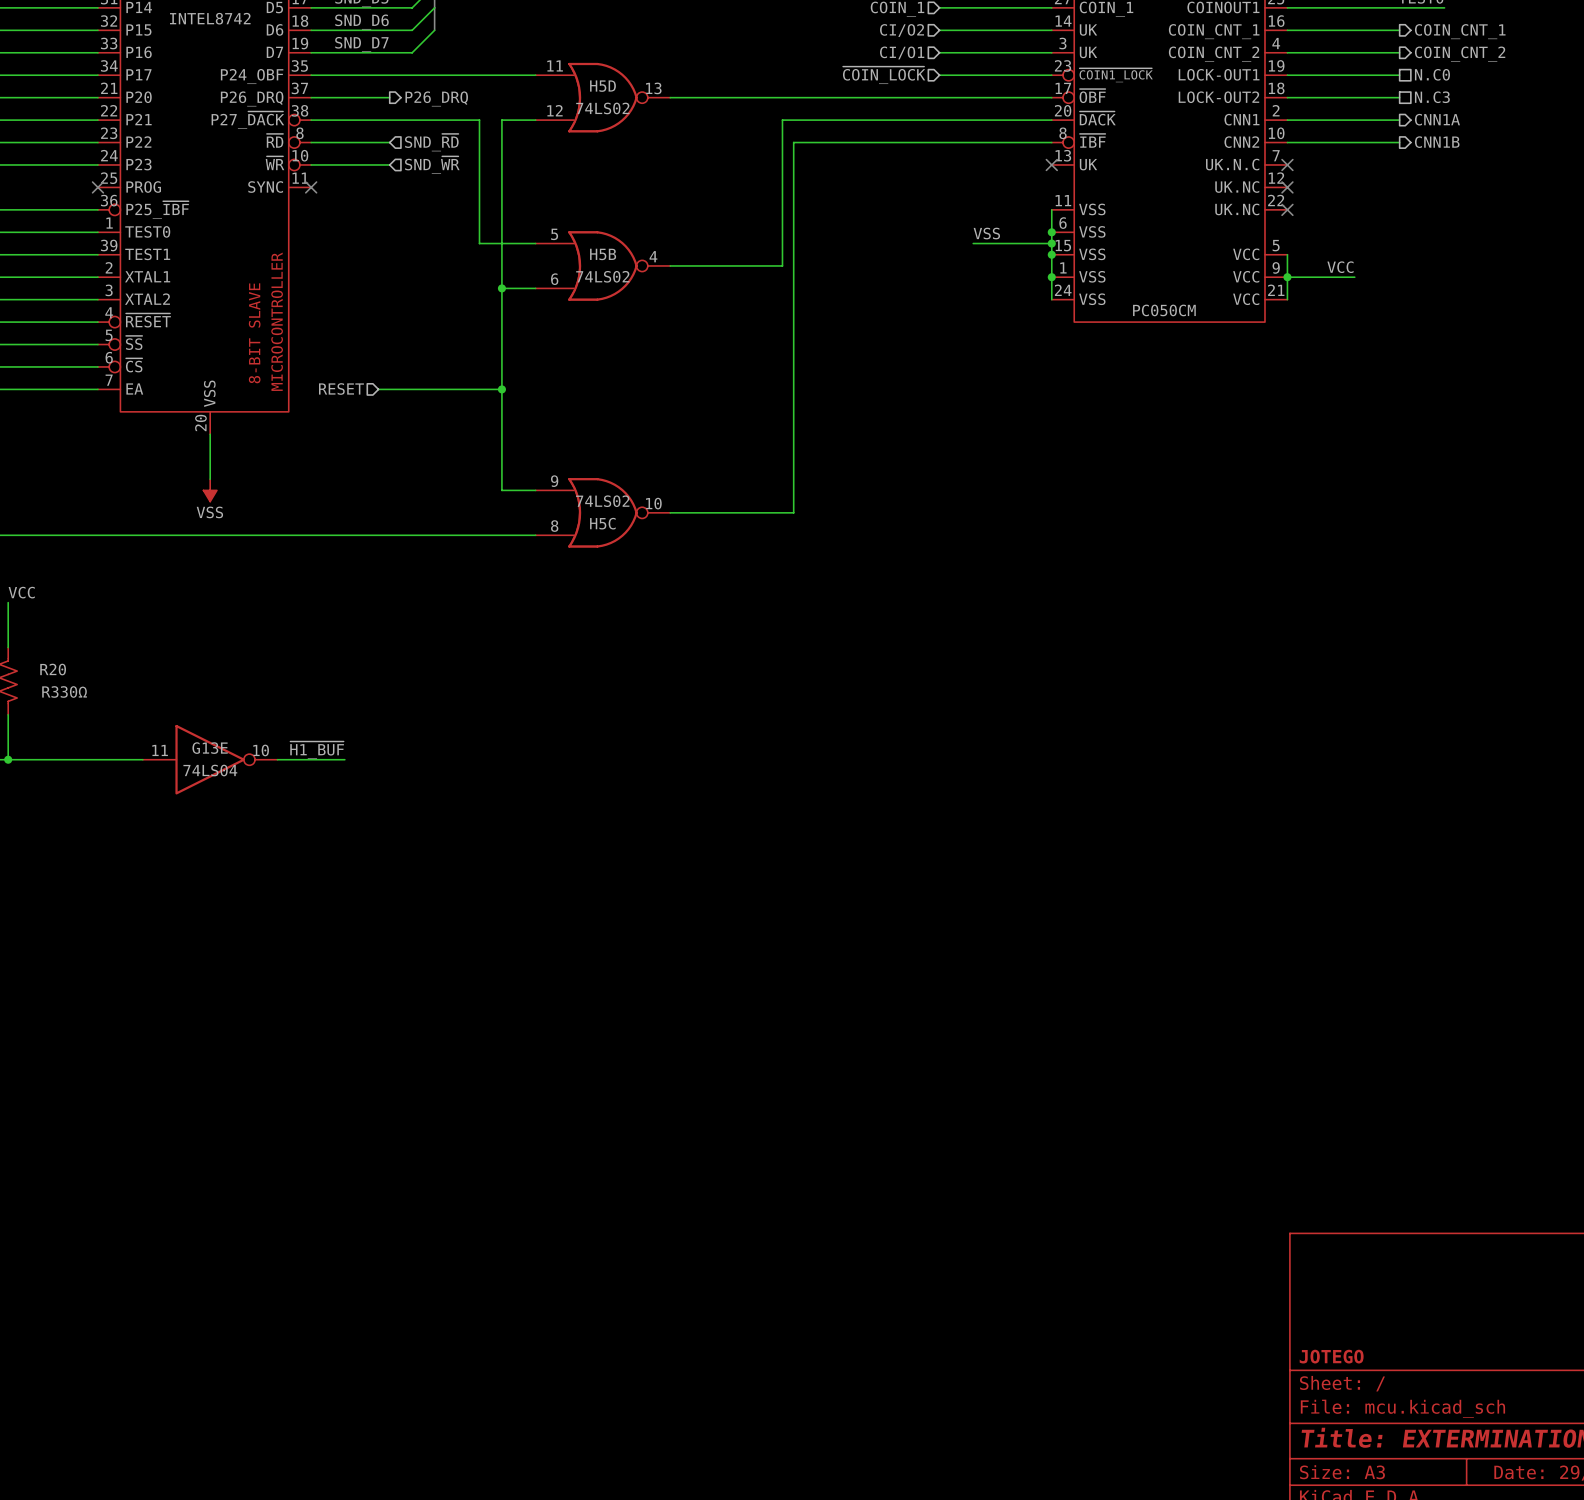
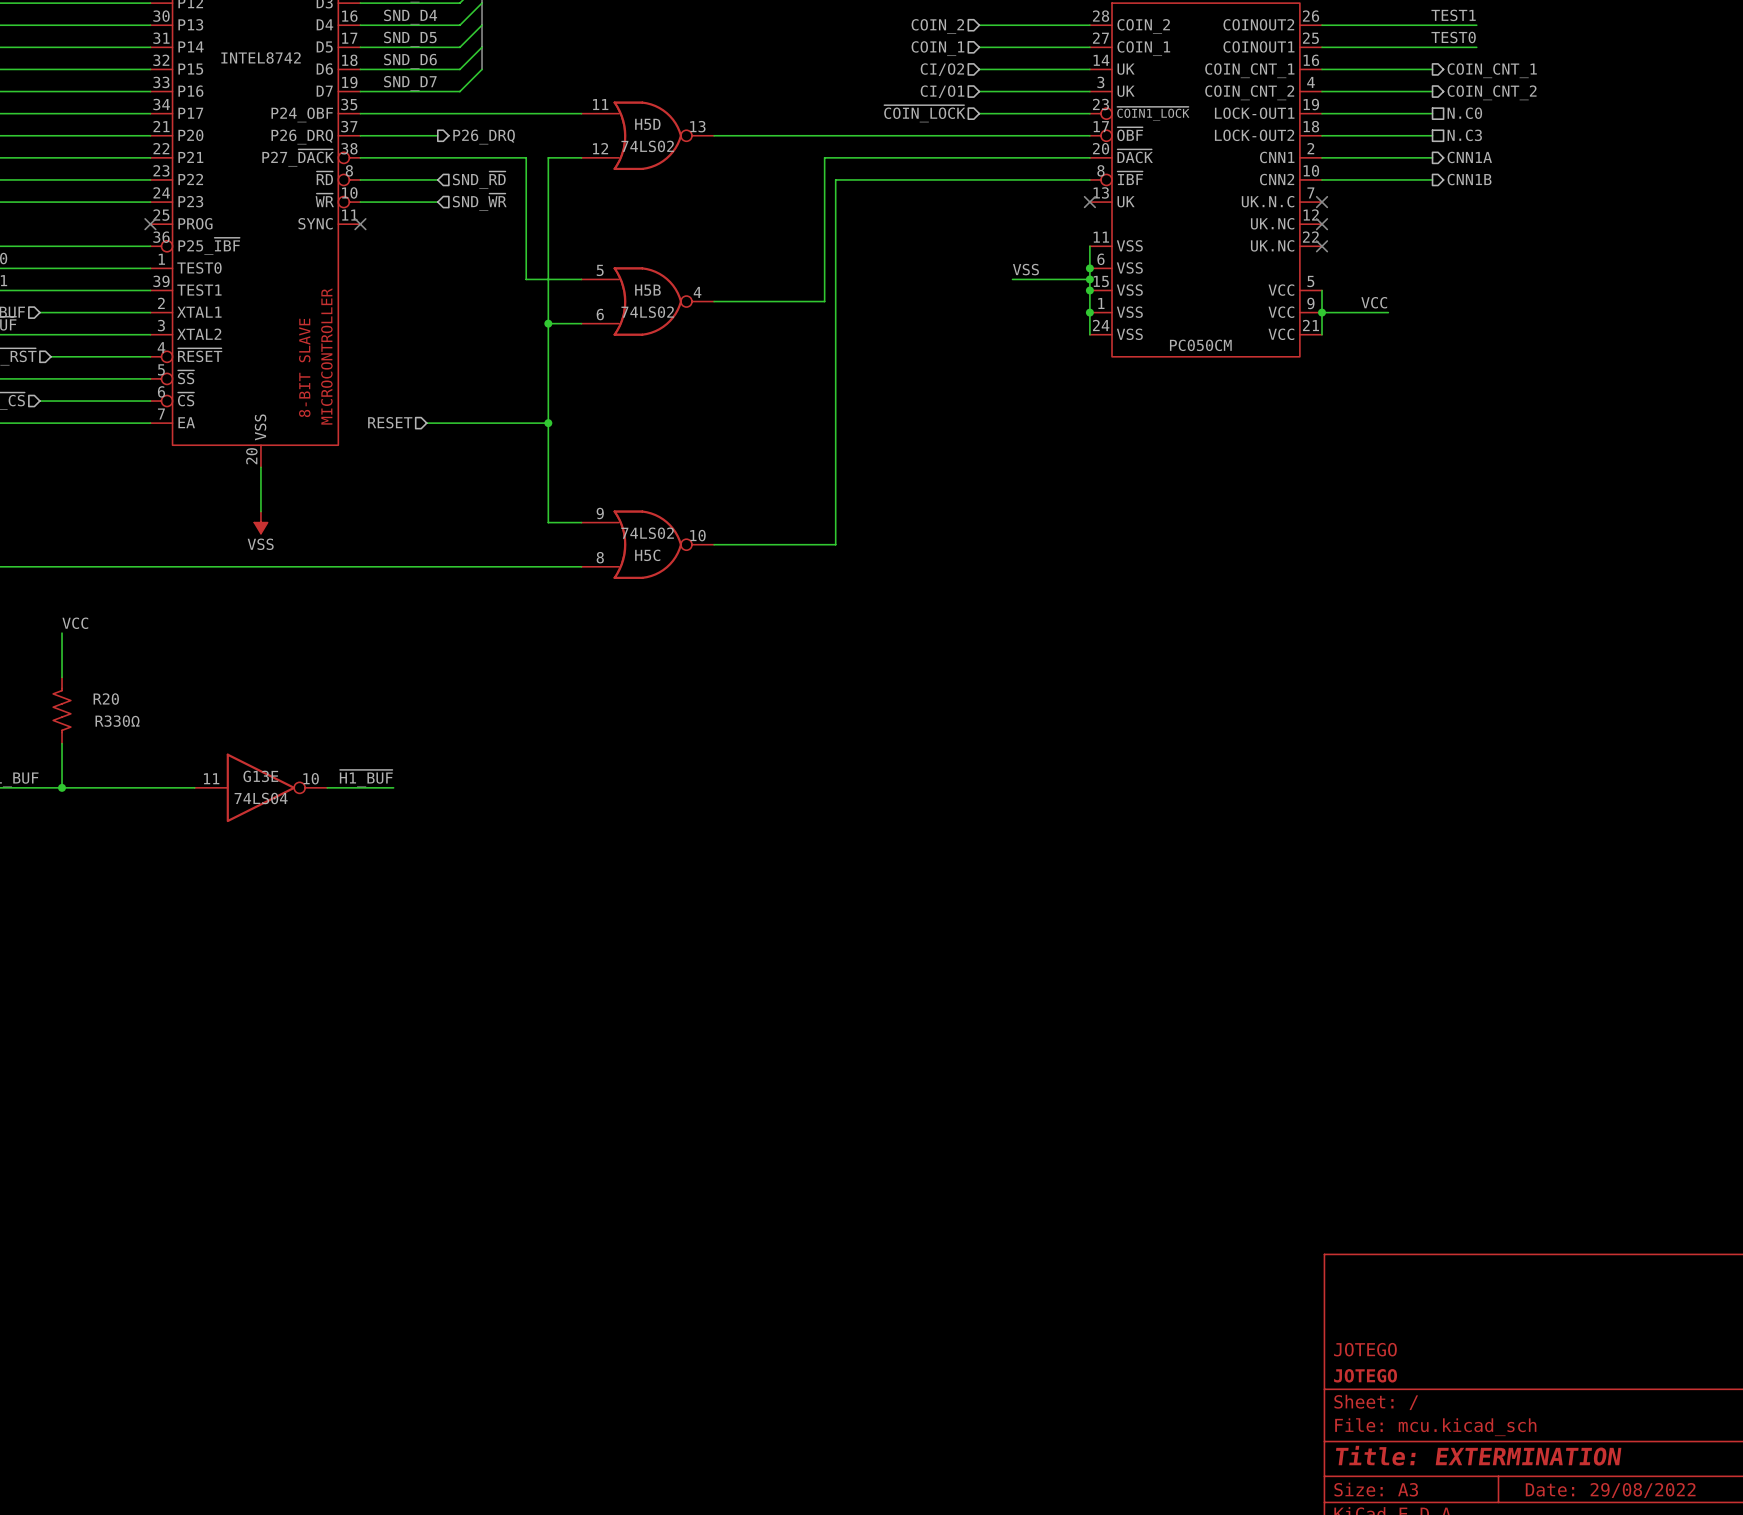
title block: none -> JOTEGO (1365, 1349)

